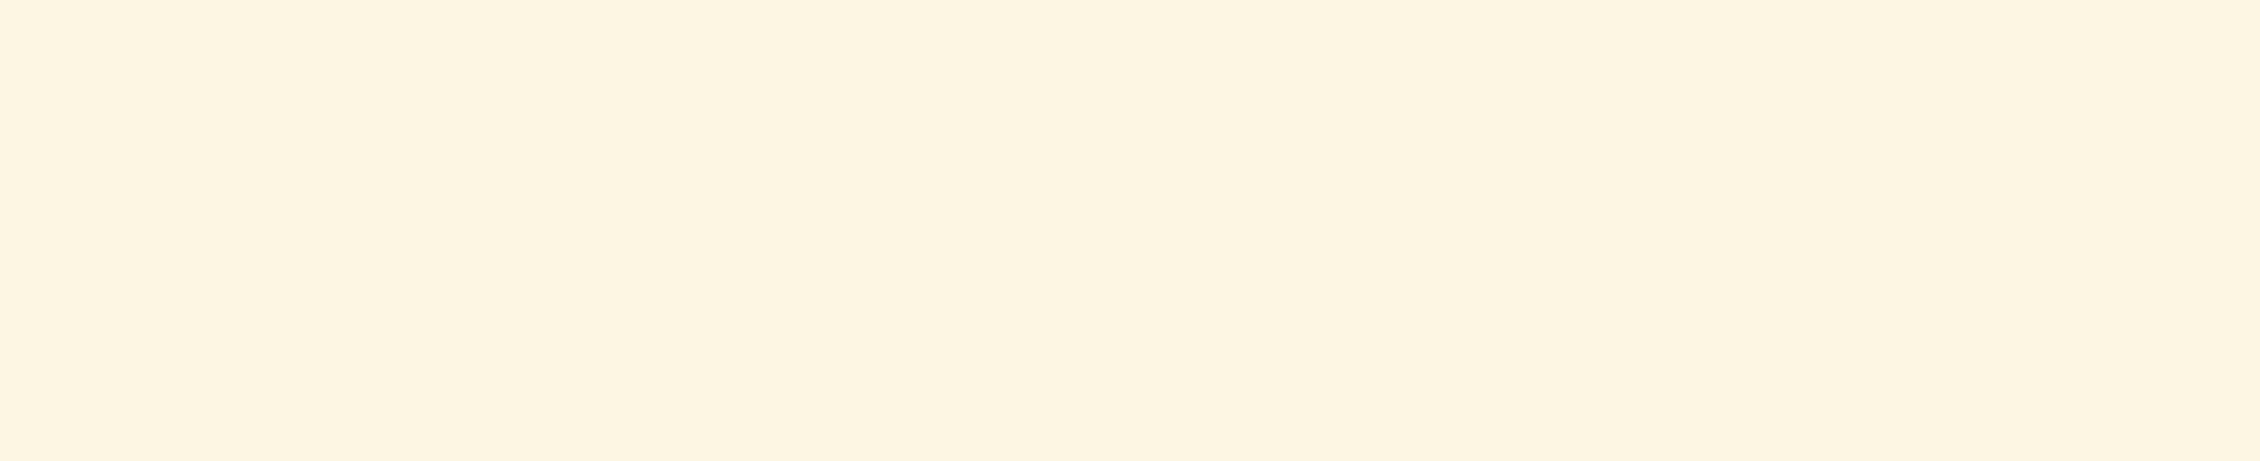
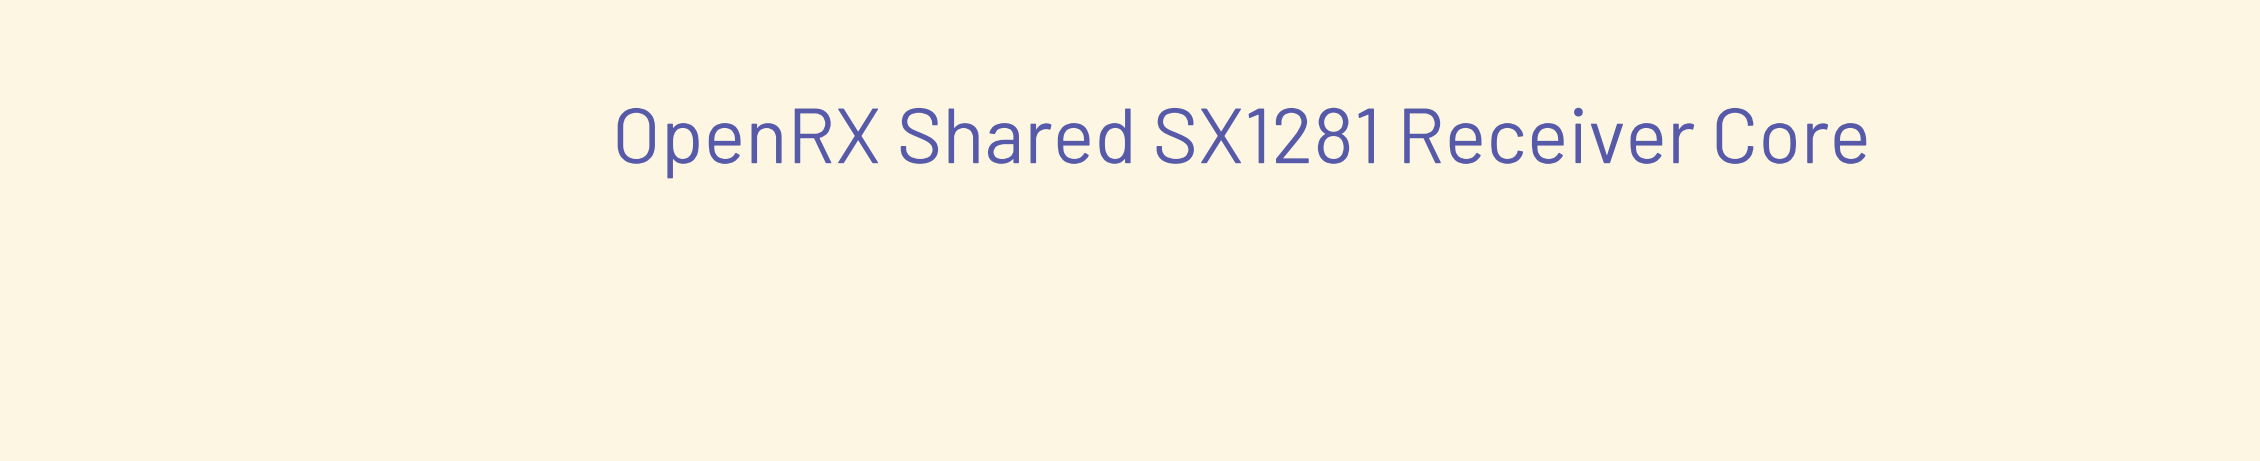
text: none -> OpenRX Shared SX1281 Receiver Core (1241, 143)

